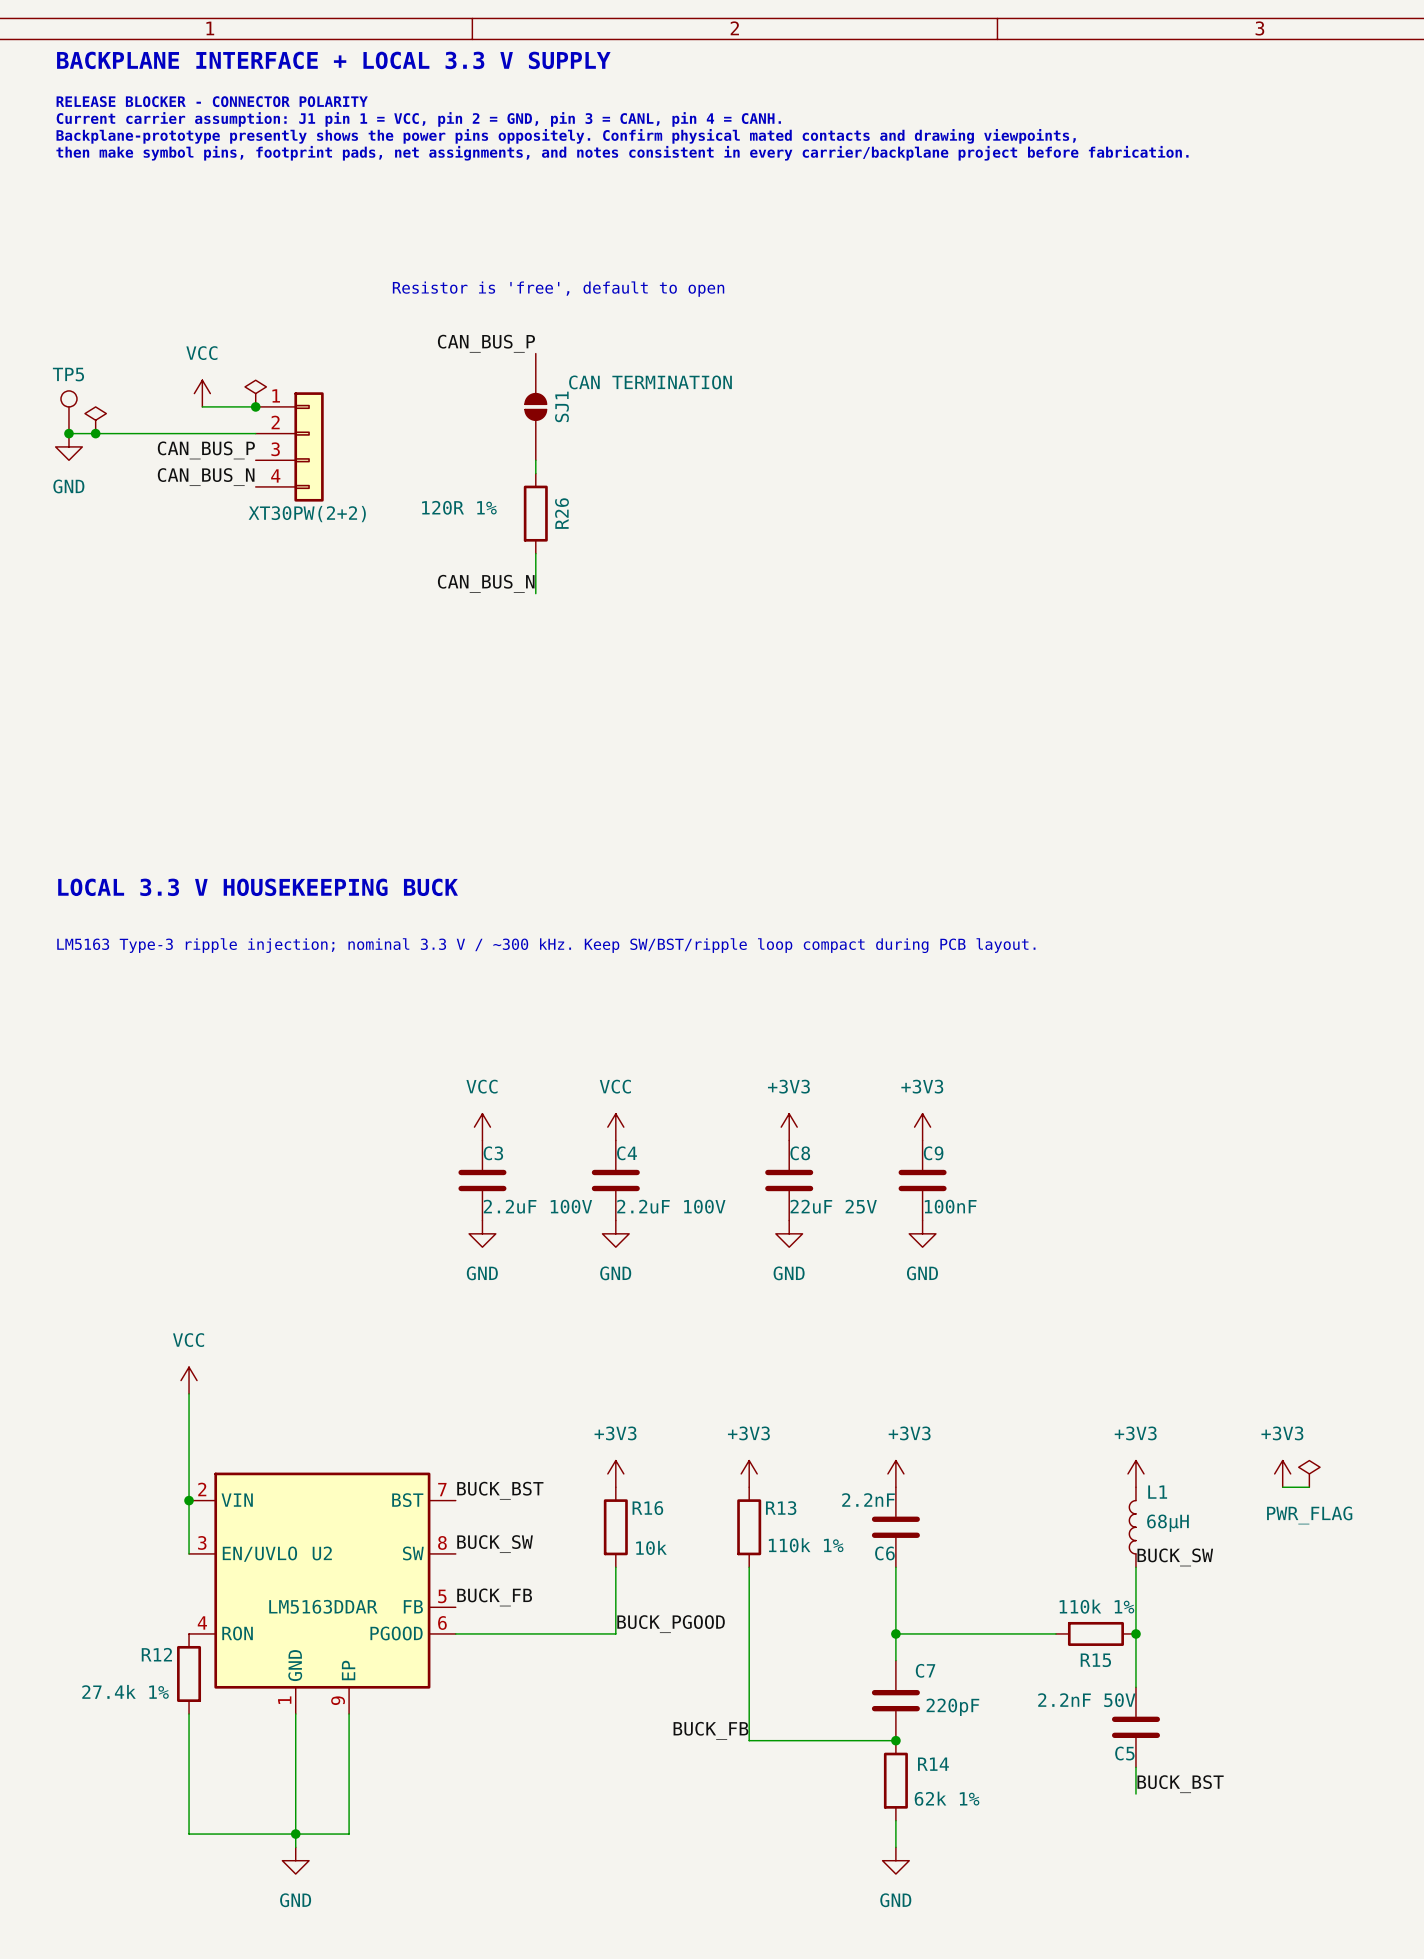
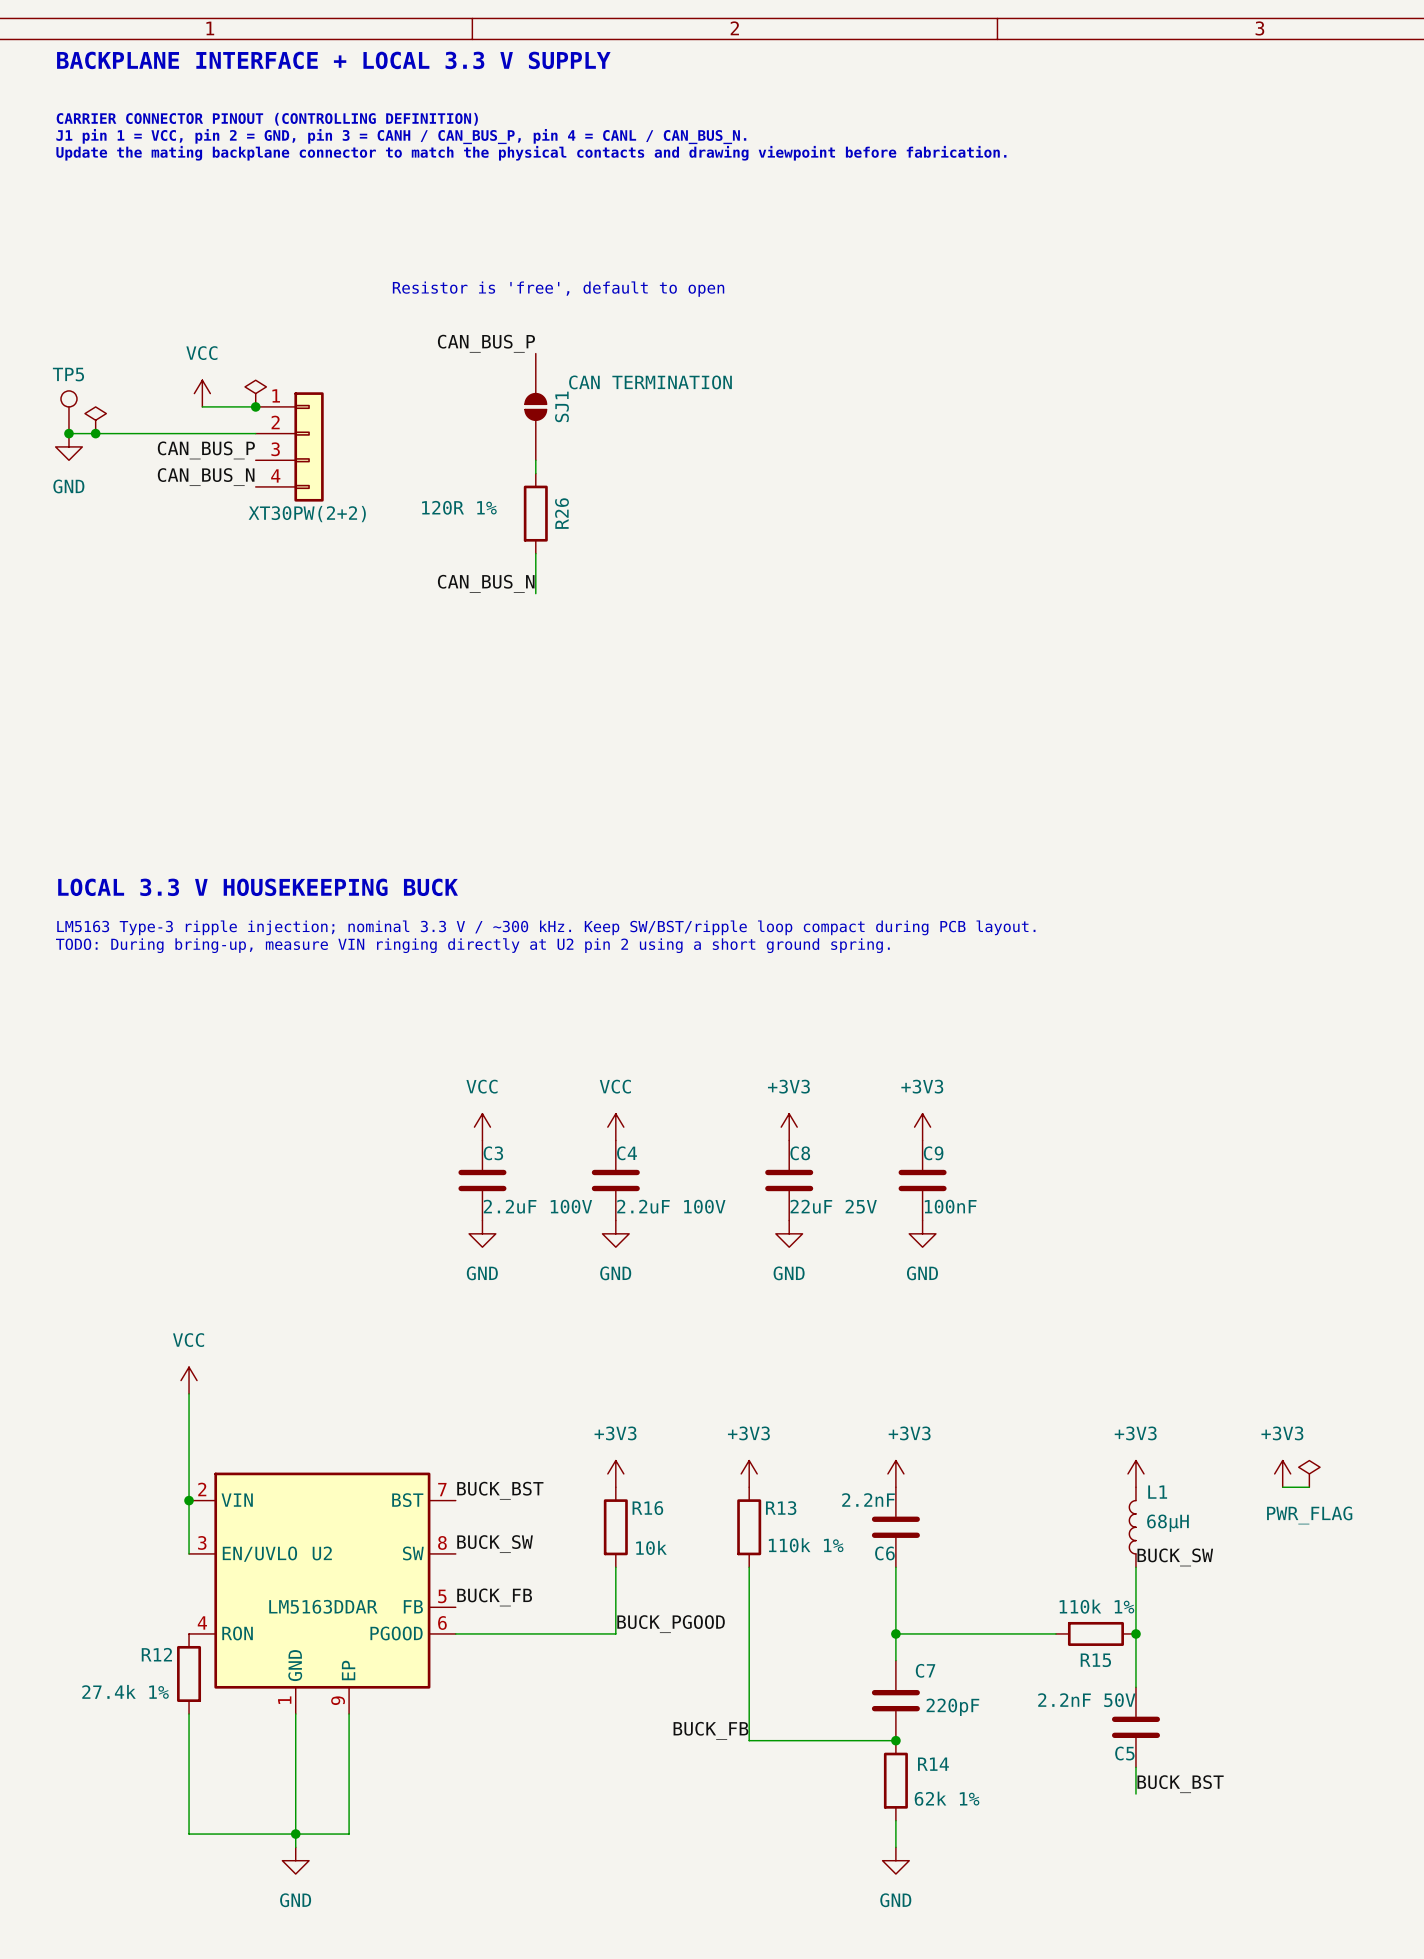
text: RELEASE BLOCKER - CONNECTOR POLARITY (212, 101) -> none
text: Current carrier assumption: J1 pin 1 = VCC, pin 2 = GND, pin 3 = CANL, pin 4 = CANH. (418, 119) -> CARRIER CONNECTOR PINOUT (CONTROLLING DEFINITION) (267, 119)
text: Backplane-prototype presently shows the power pins oppositely. Confirm physical mated contacts and drawing viewpoints, (566, 136) -> J1 pin 1 = VCC, pin 2 = GND, pin 3 = CANH / CAN_BUS_P, pin 4 = CANL / CAN_BUS_N. (401, 136)
text: then make symbol pins, footprint pads, net assignments, and notes consistent in every carrier/backplane project before fabrication. (622, 153) -> Update the mating backplane connector to match the physical contacts and drawing viewpoint before fabrication. (531, 153)
text: none -> LM5163 Type-3 ripple injection; nominal 3.3 V / ~300 kHz. Keep SW/BST/ripple loop compact during PCB layout. (546, 927)
text: LM5163 Type-3 ripple injection; nominal 3.3 V / ~300 kHz. Keep SW/BST/ripple loop compact during PCB layout. (546, 945) -> TODO: During bring-up, measure VIN ringing directly at U2 pin 2 using a short ground spring. (472, 945)

